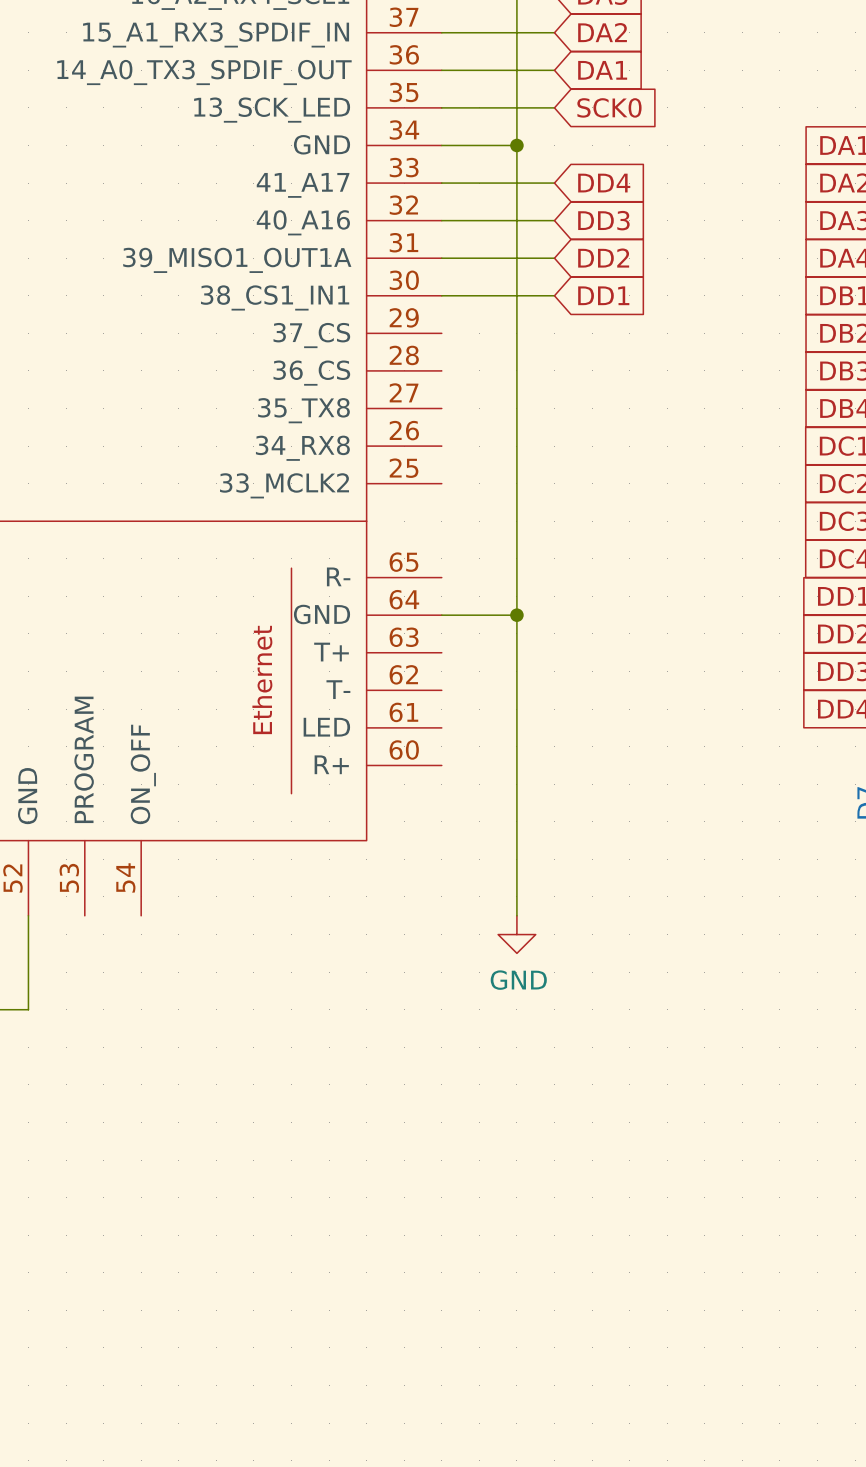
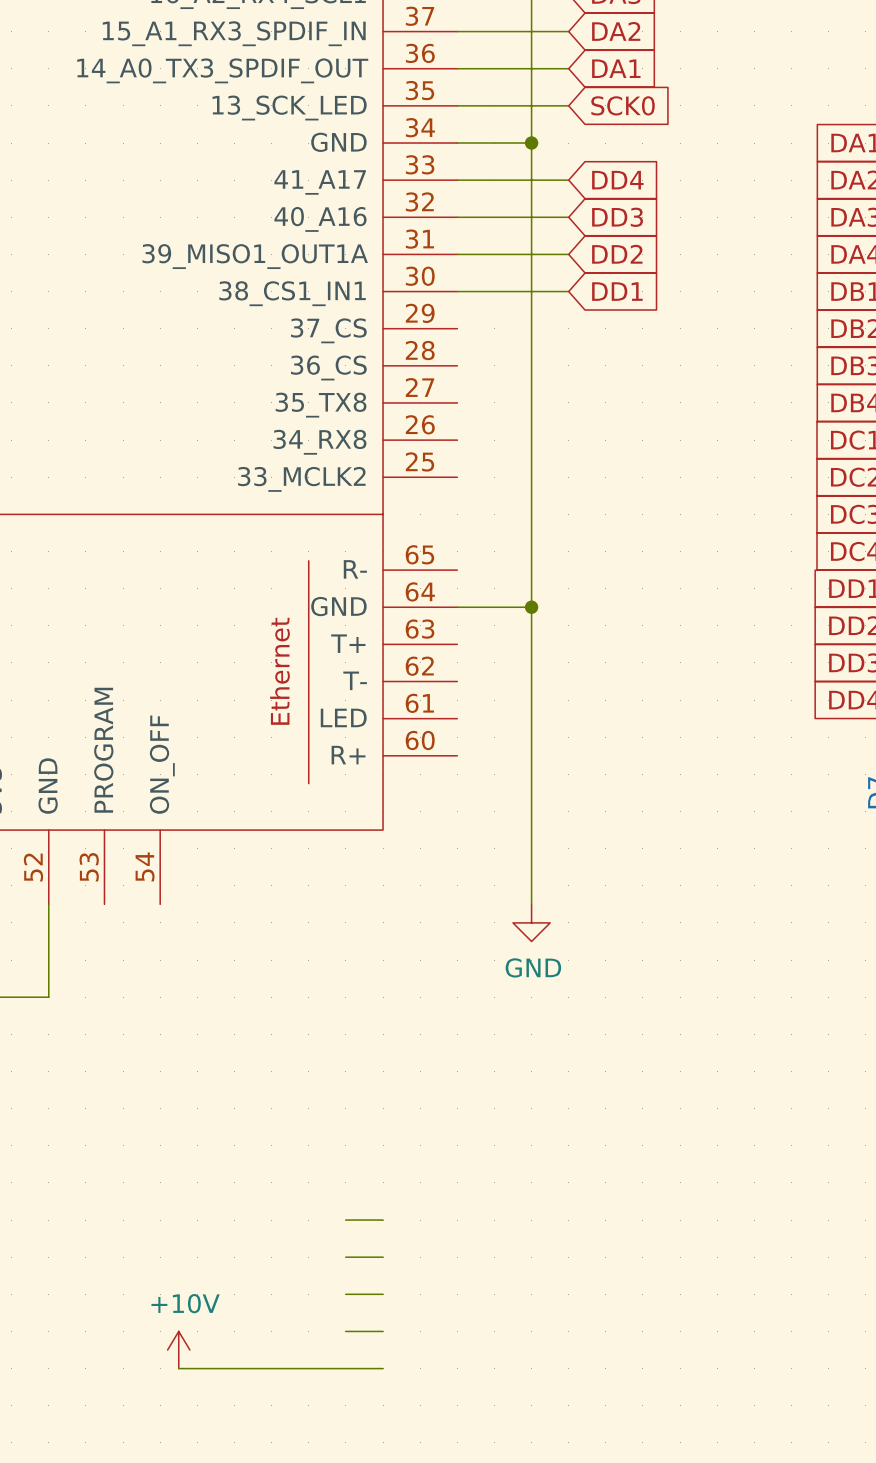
wire: none -> (345, 1220) (383, 1220)
wire: none -> (345, 1257) (383, 1257)
wire: none -> (345, 1294) (383, 1294)
wire: none -> (345, 1331) (383, 1331)
power symbol: none -> +10V (178, 1350)
wire: none -> (178, 1368) (383, 1368)

